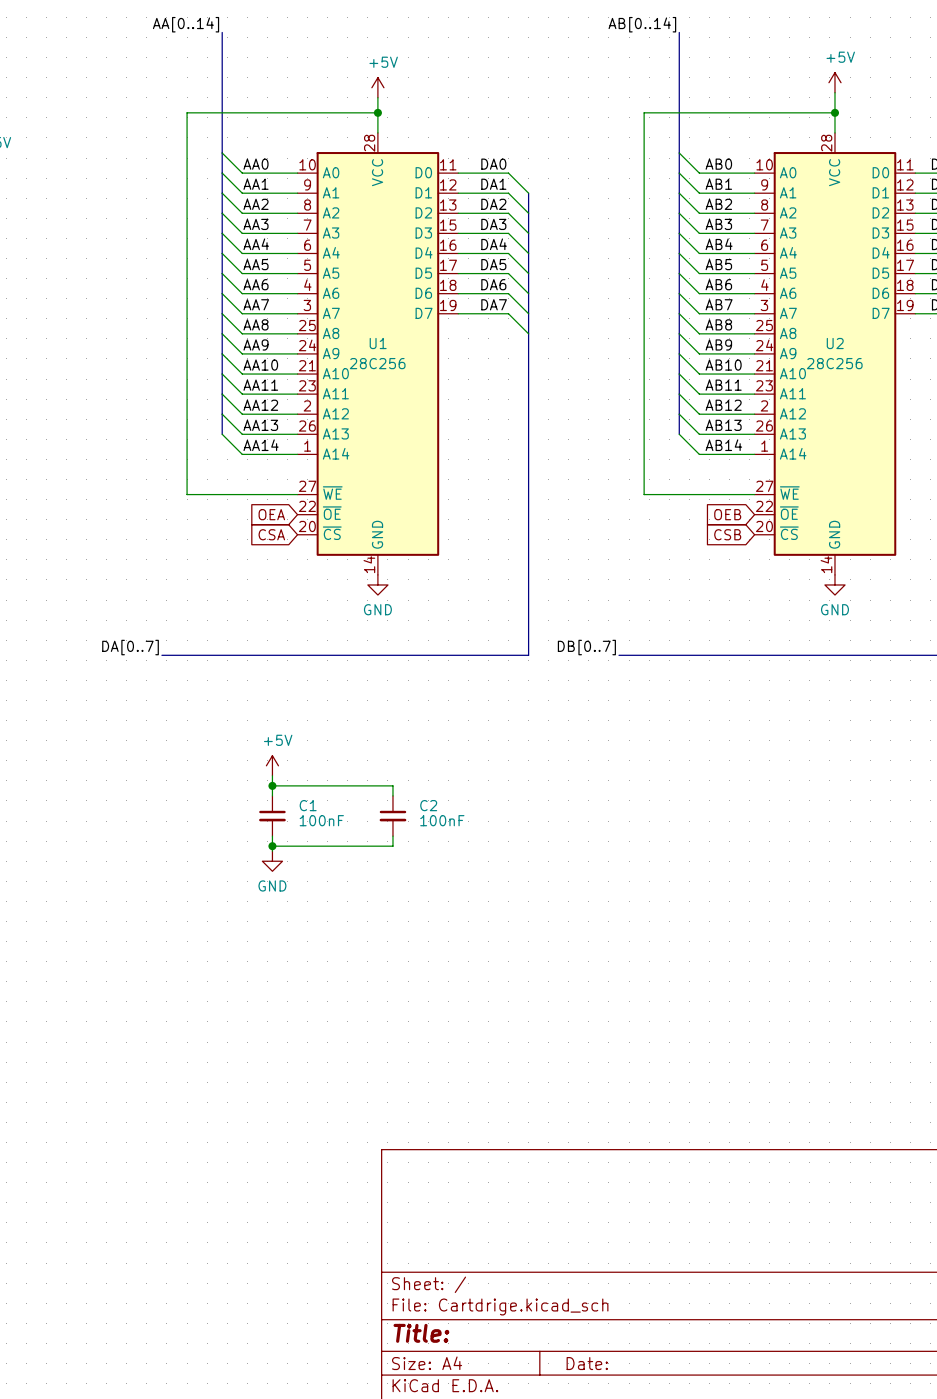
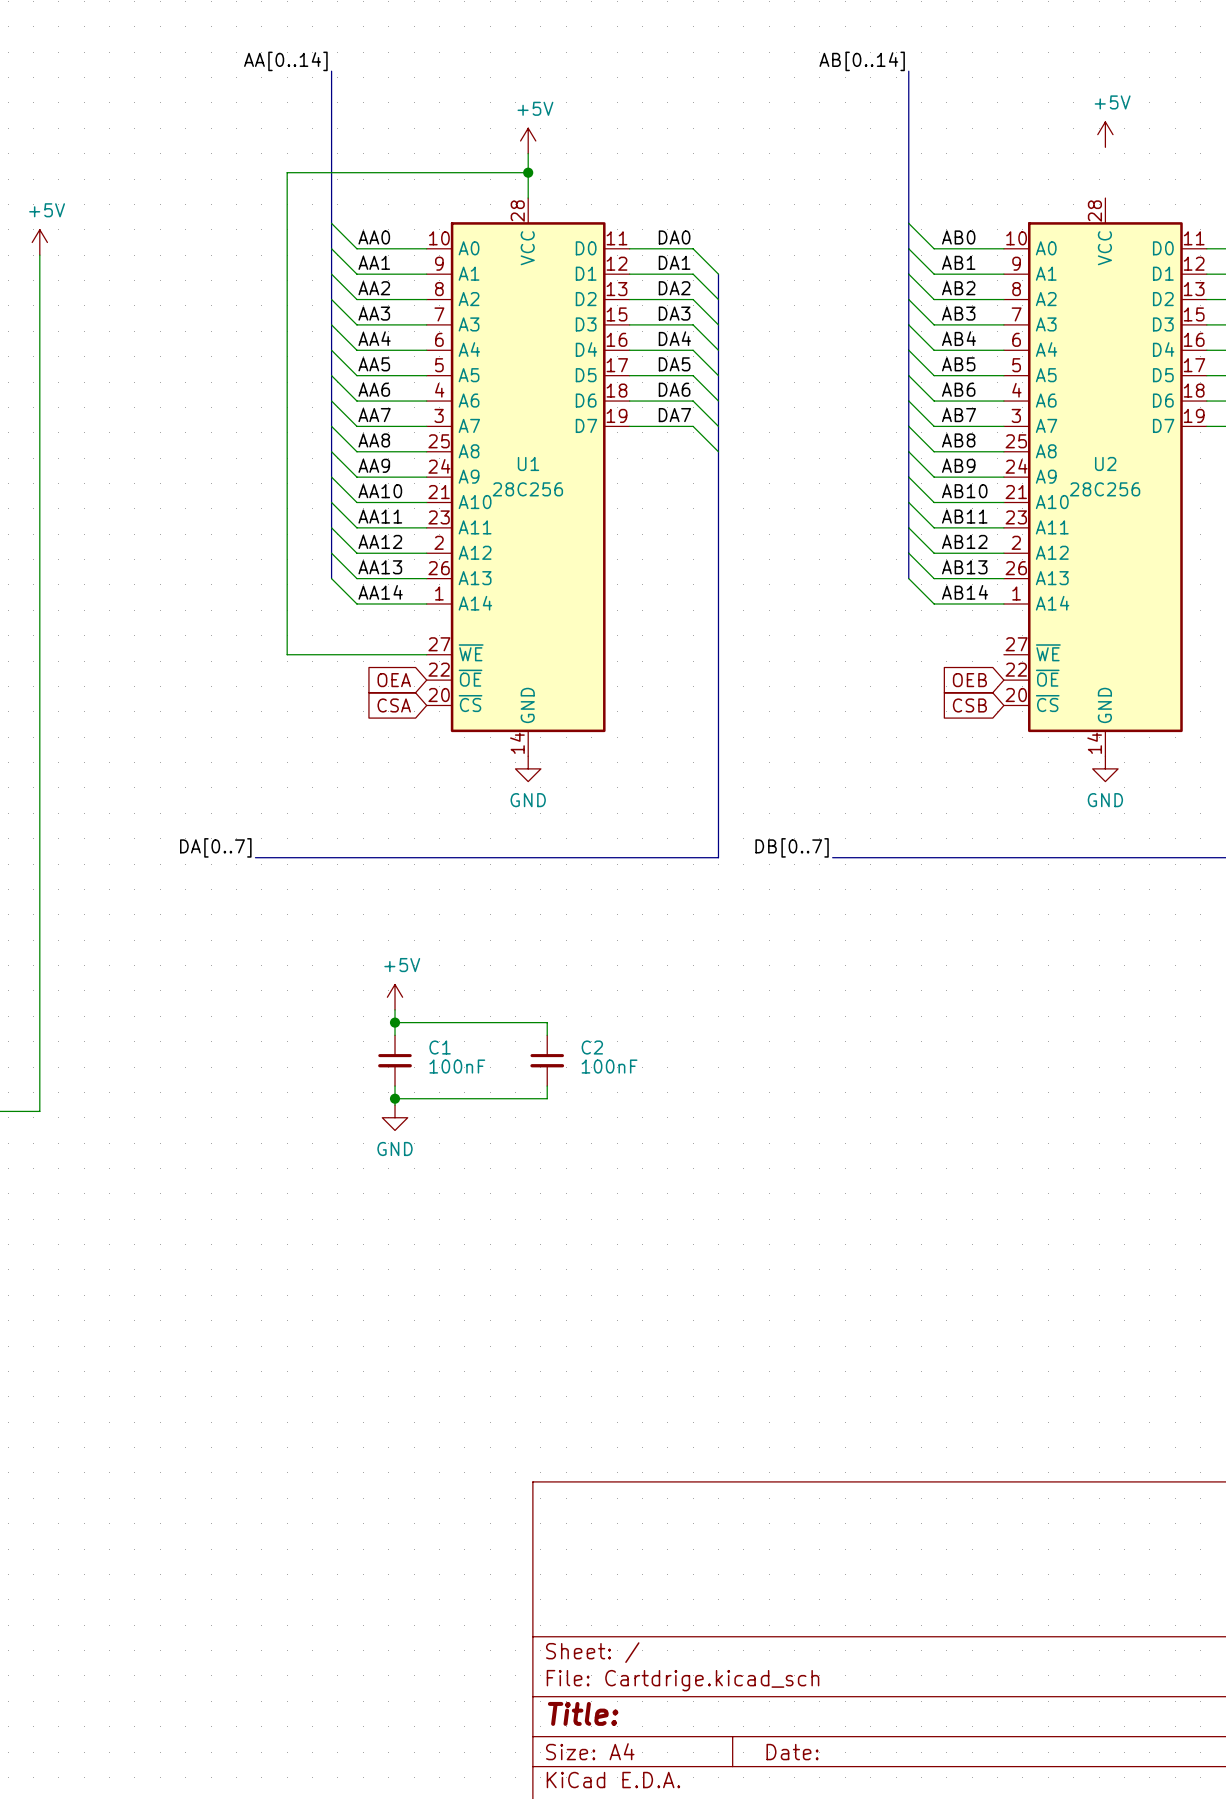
wire: (834, 92) (834, 132) -> none
wire: (834, 112) (644, 112) (644, 494) (754, 494) -> none
junction: (834, 112) -> none

